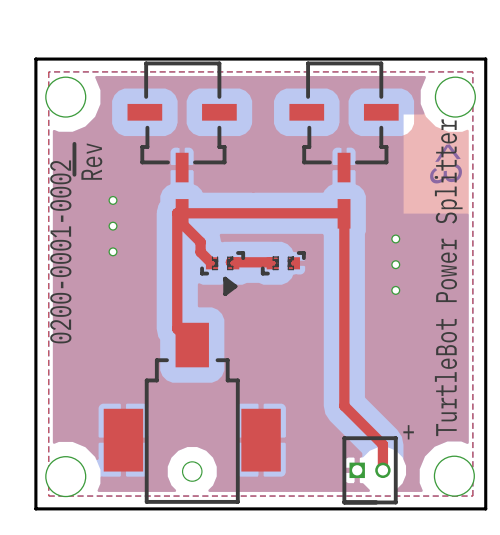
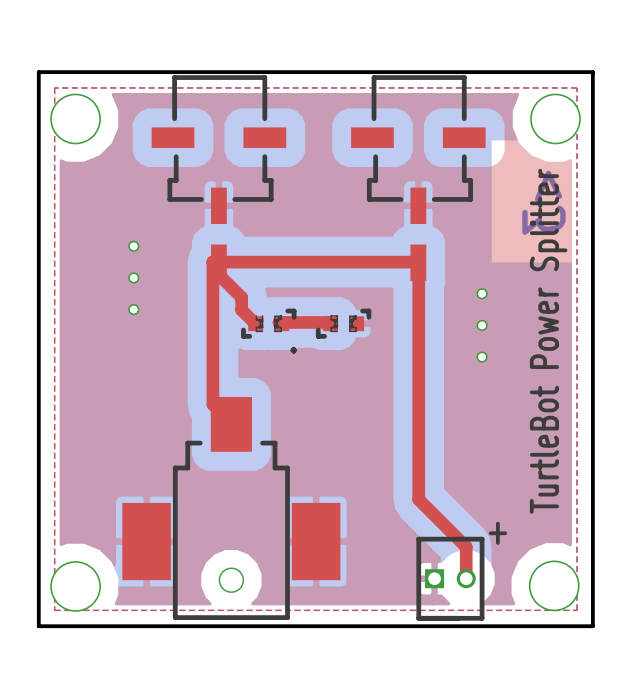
line: (74, 143) (74, 174) -> none
text: Rev (91, 161) -> none
text: 0200-0001-0002 (60, 251) -> none
part: none -> (268, 323)
part: (222, 273) -> none

